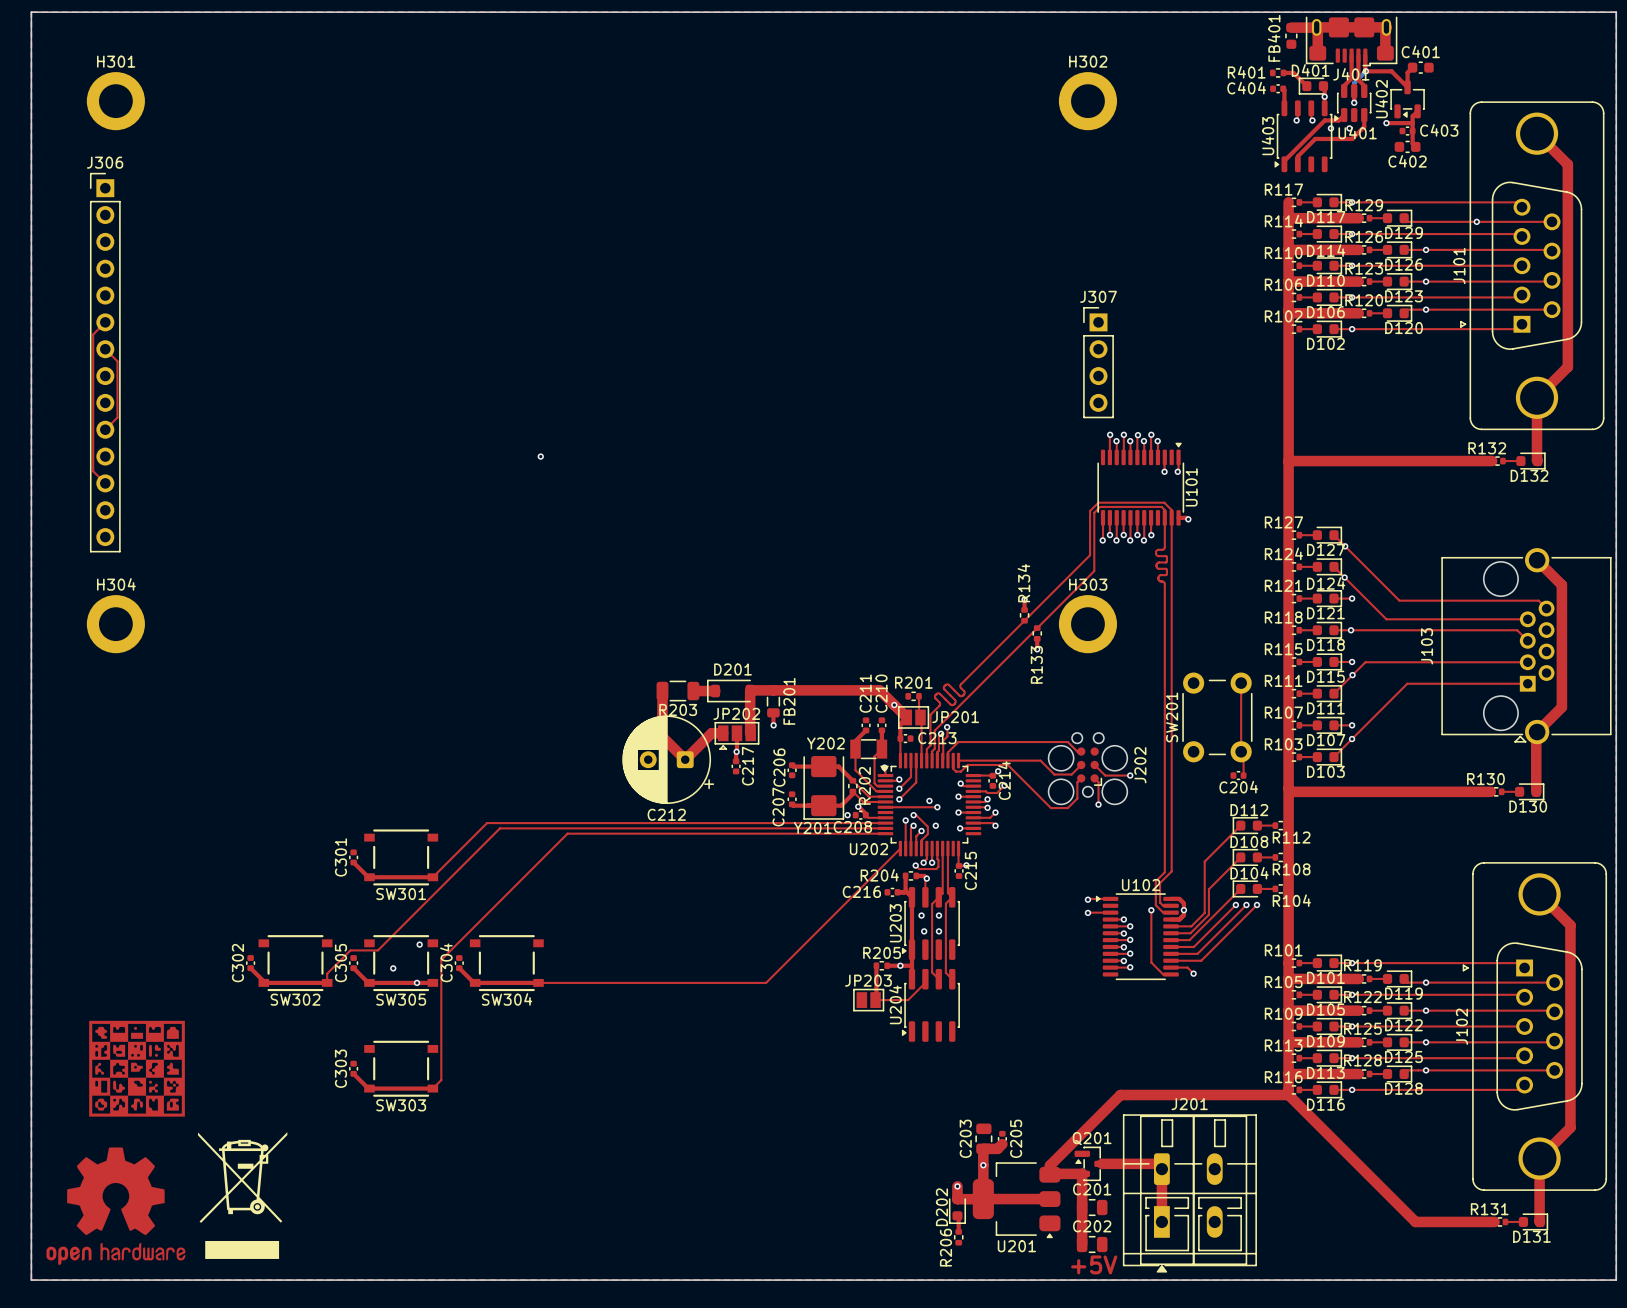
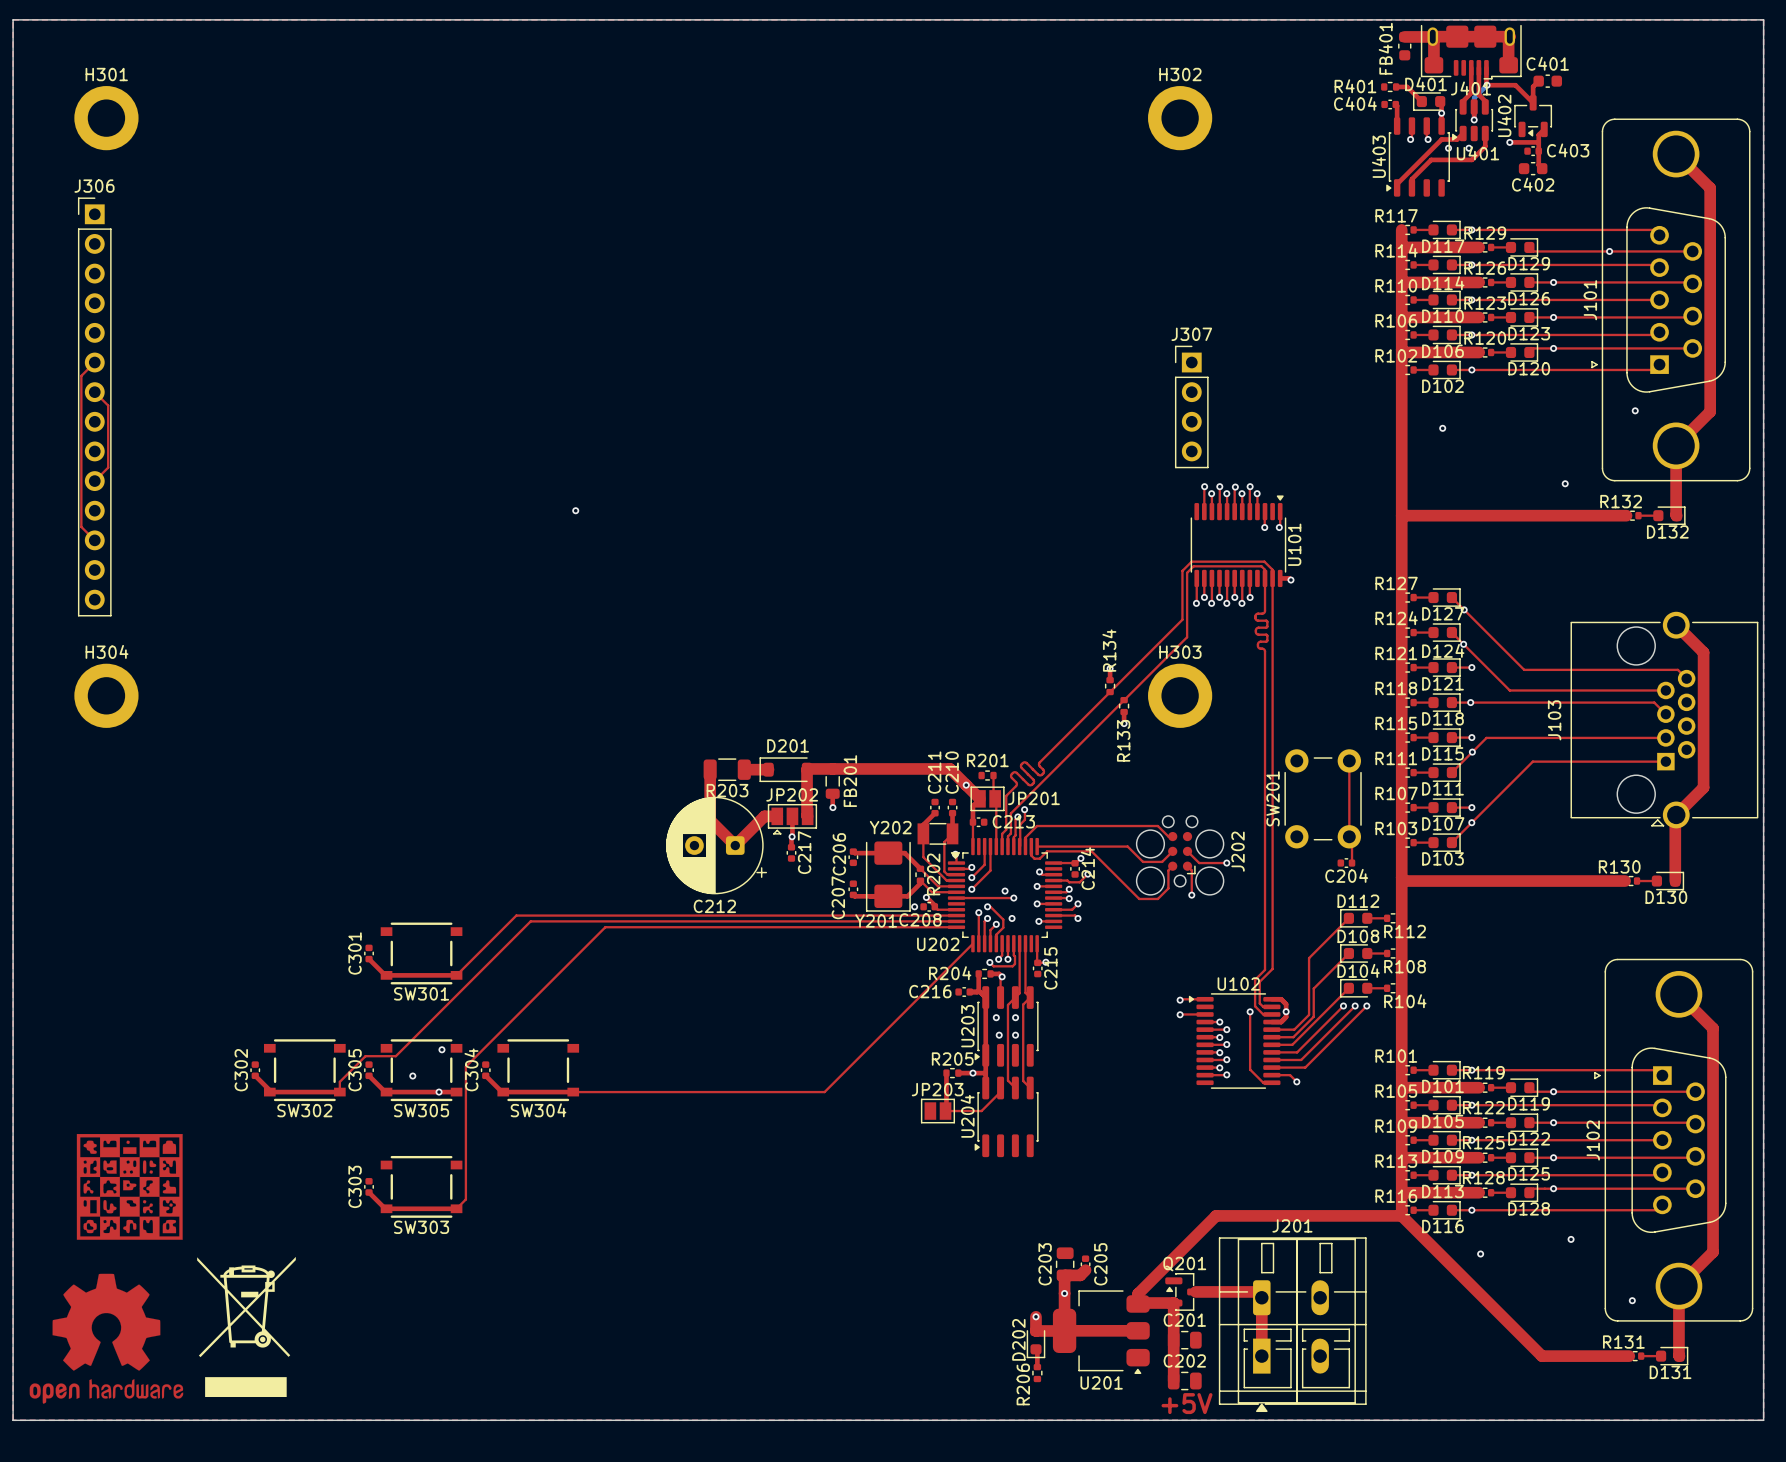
via: none -> (1635, 410)
via: none -> (1442, 428)
via: none -> (1565, 483)
via: none -> (1571, 1239)
via: none -> (1480, 1254)
via: none -> (1632, 1300)

